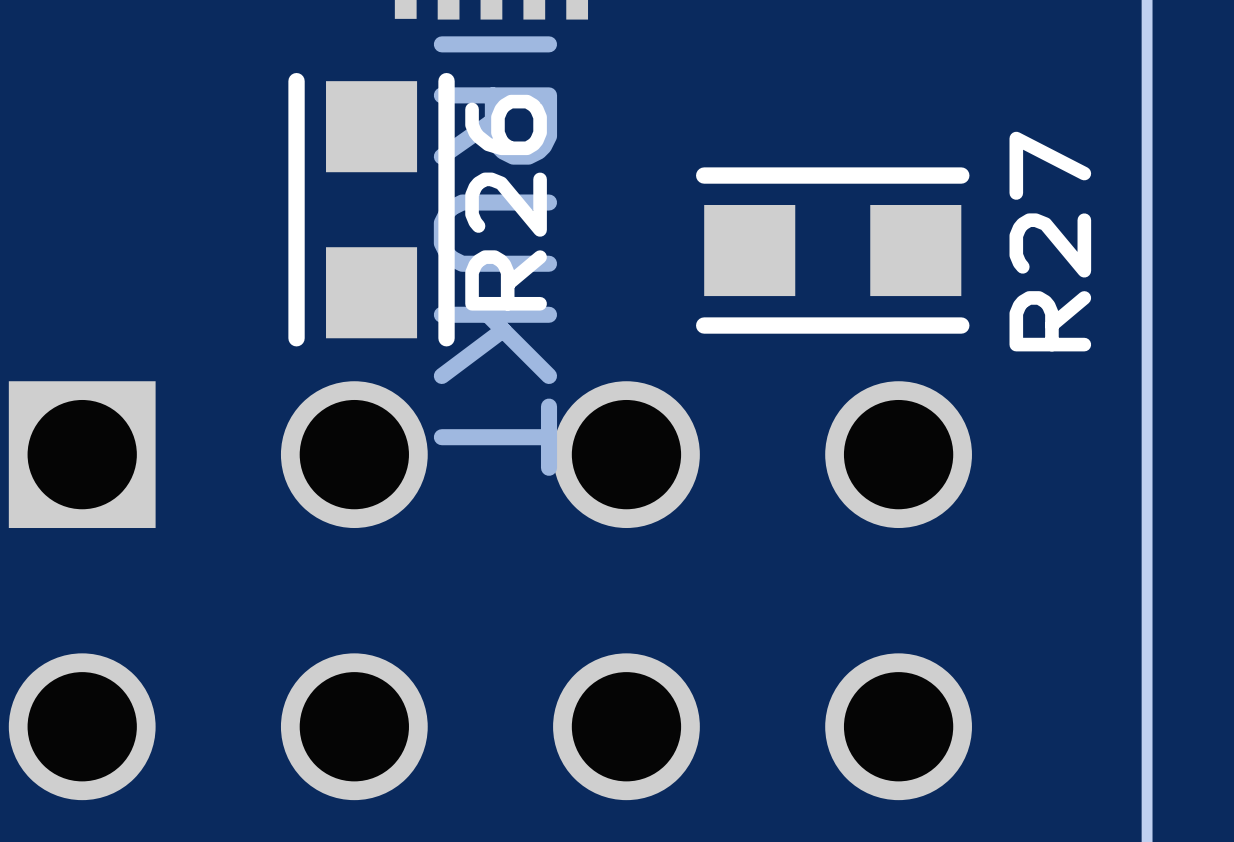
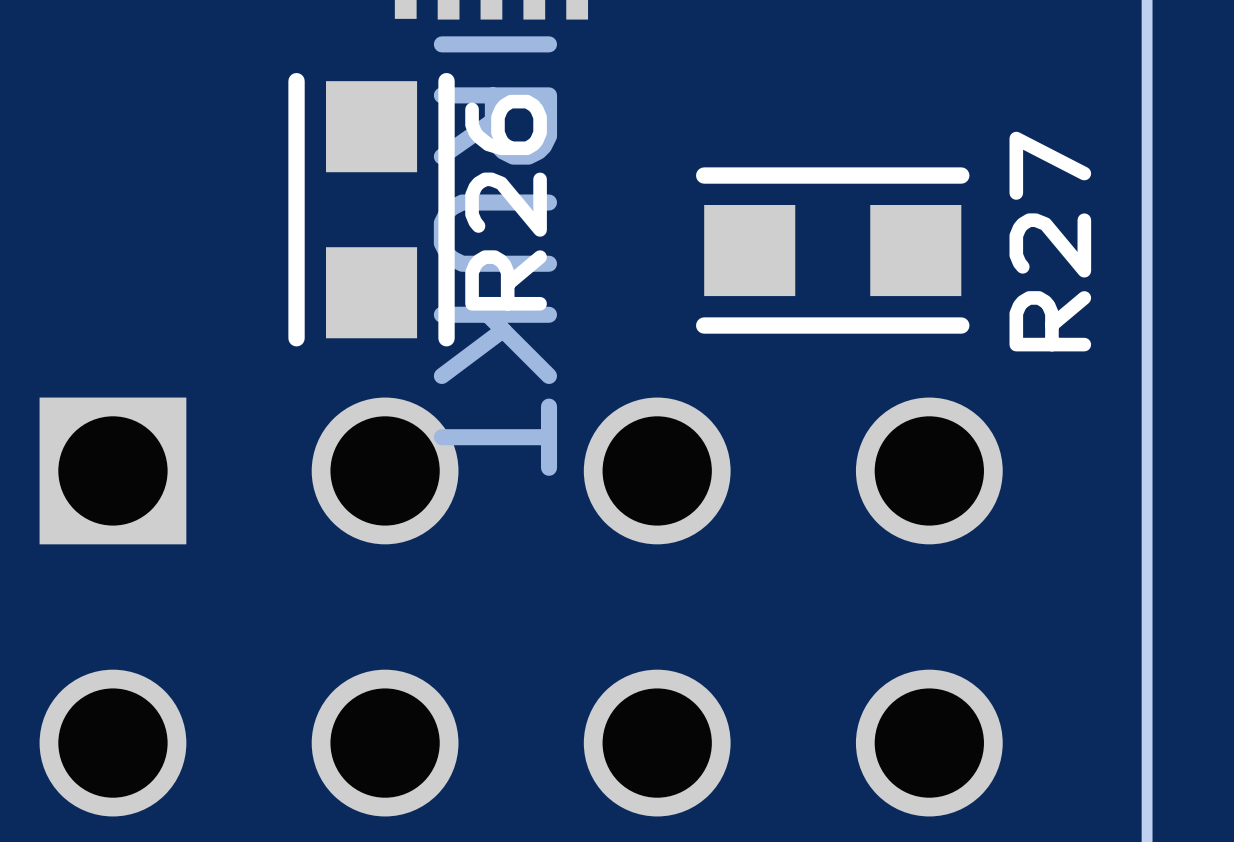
part position: (490, 590) -> (521, 607)

